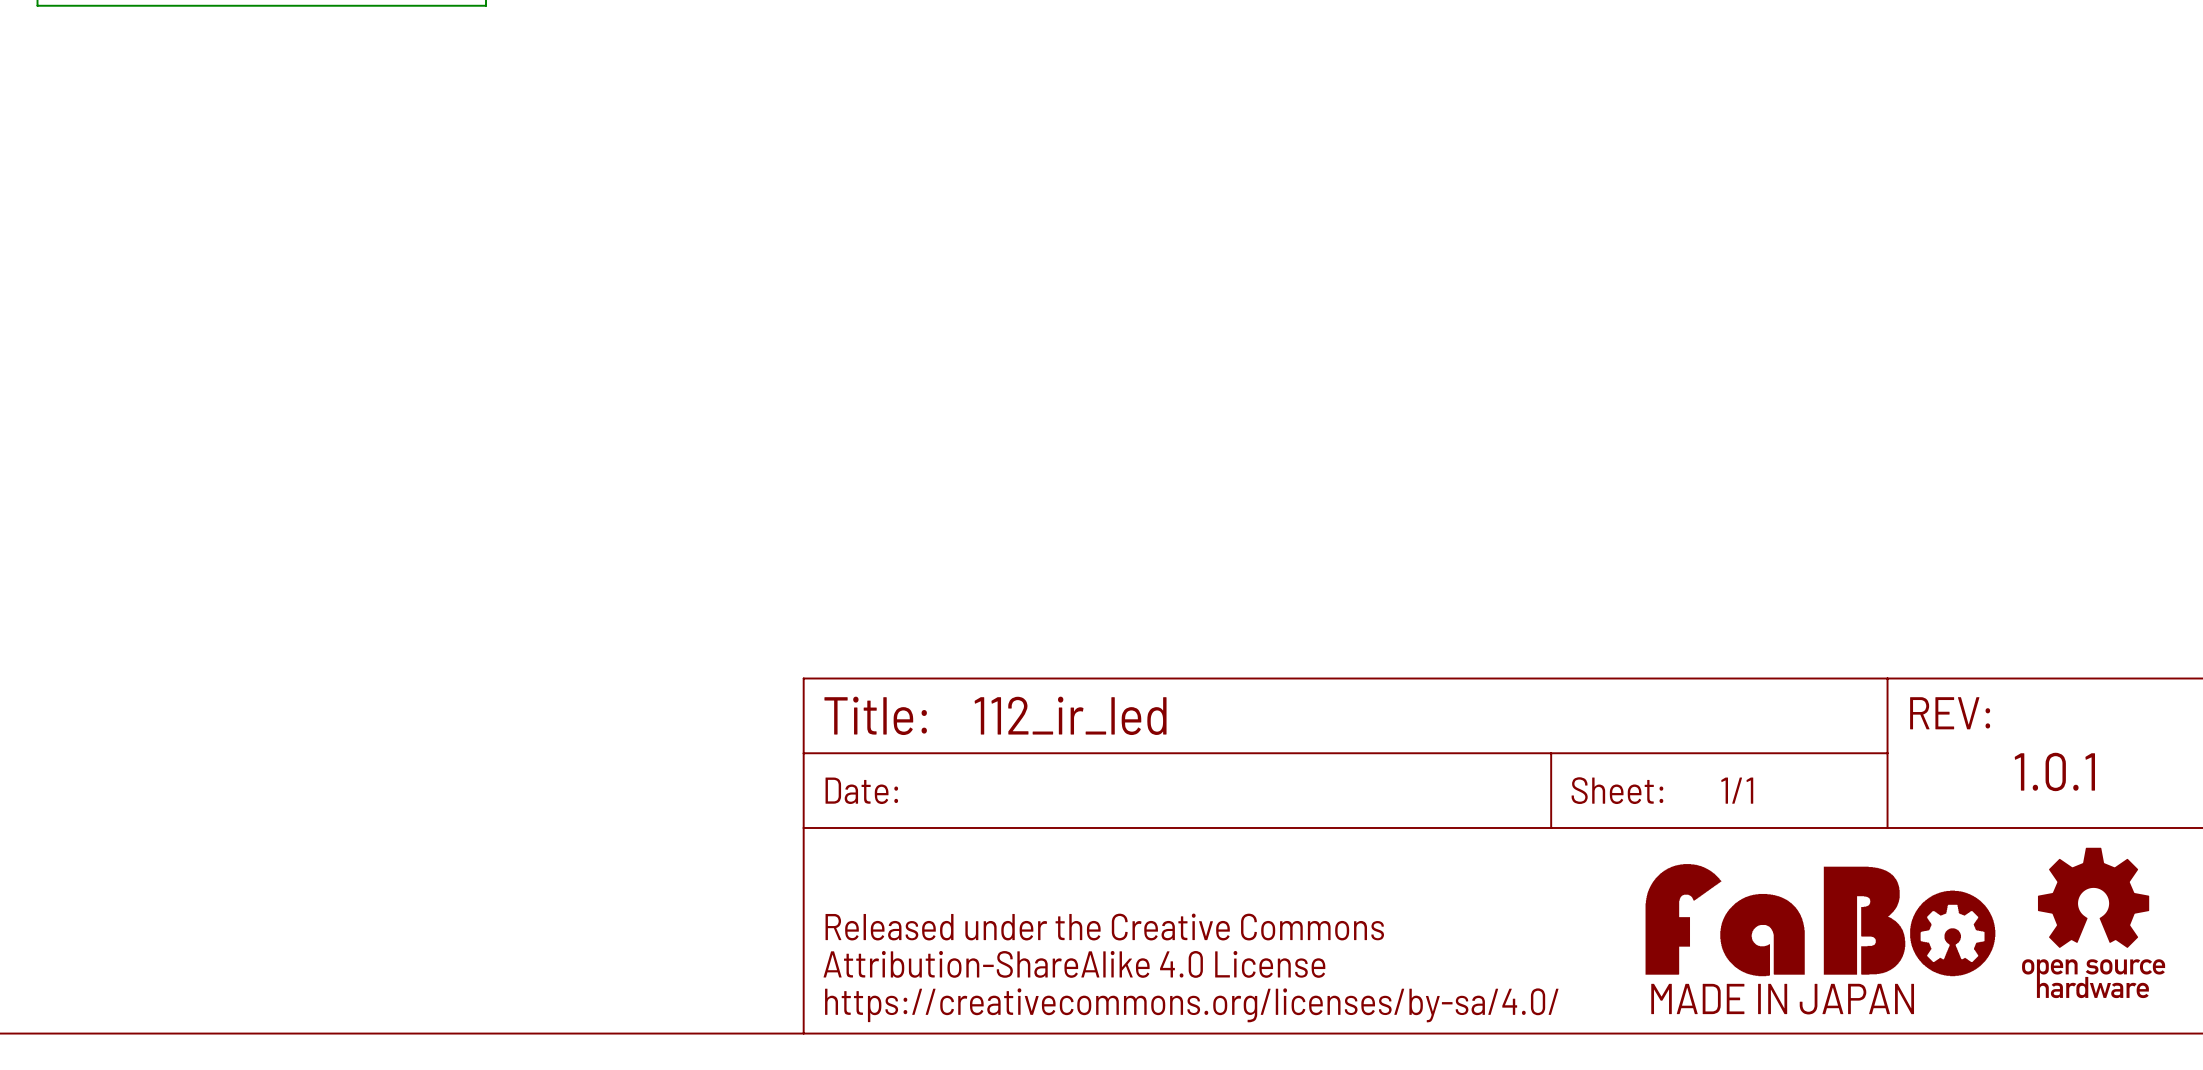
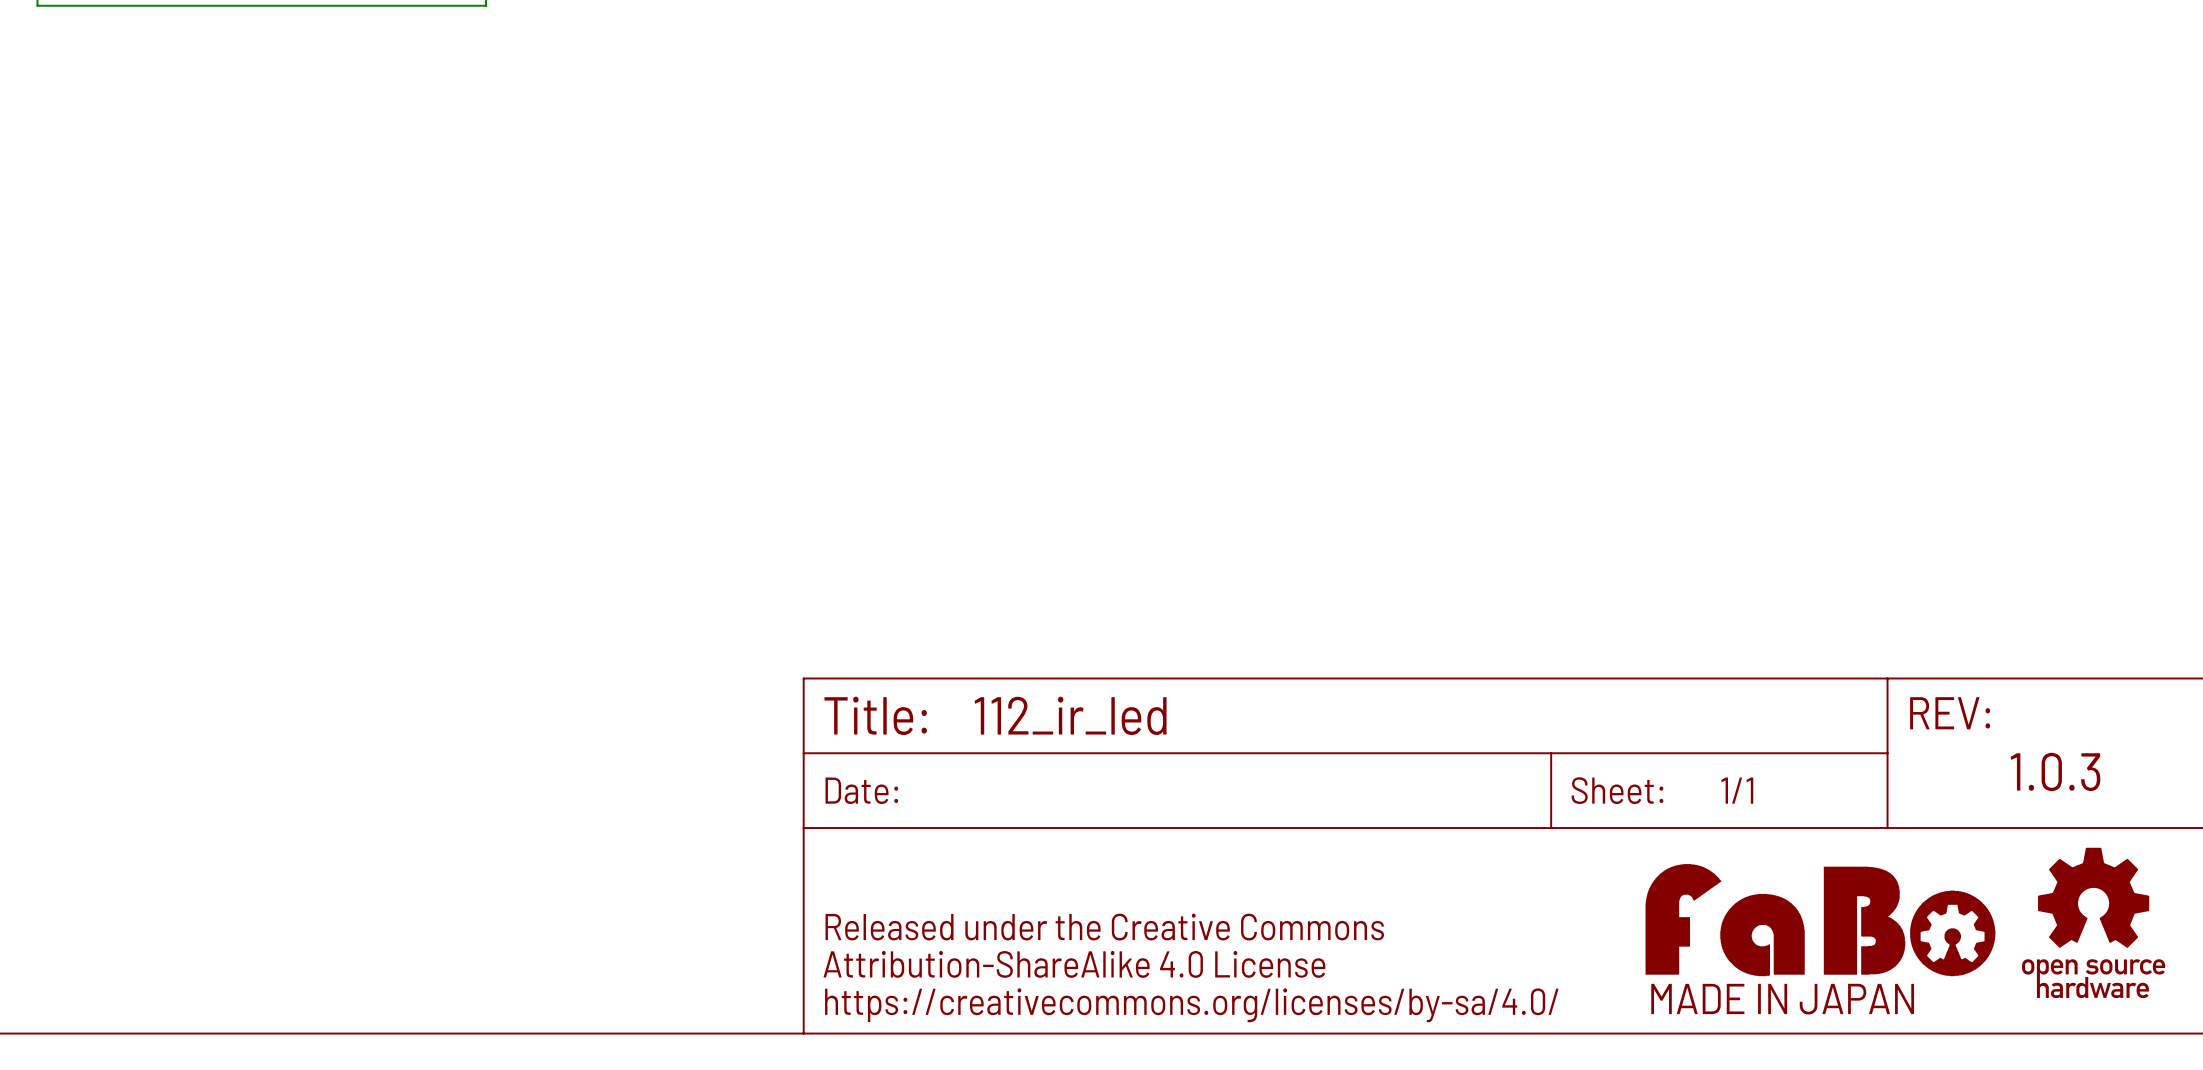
text: 1.0.1 (2054, 771) -> 1.0.3 (2055, 771)

